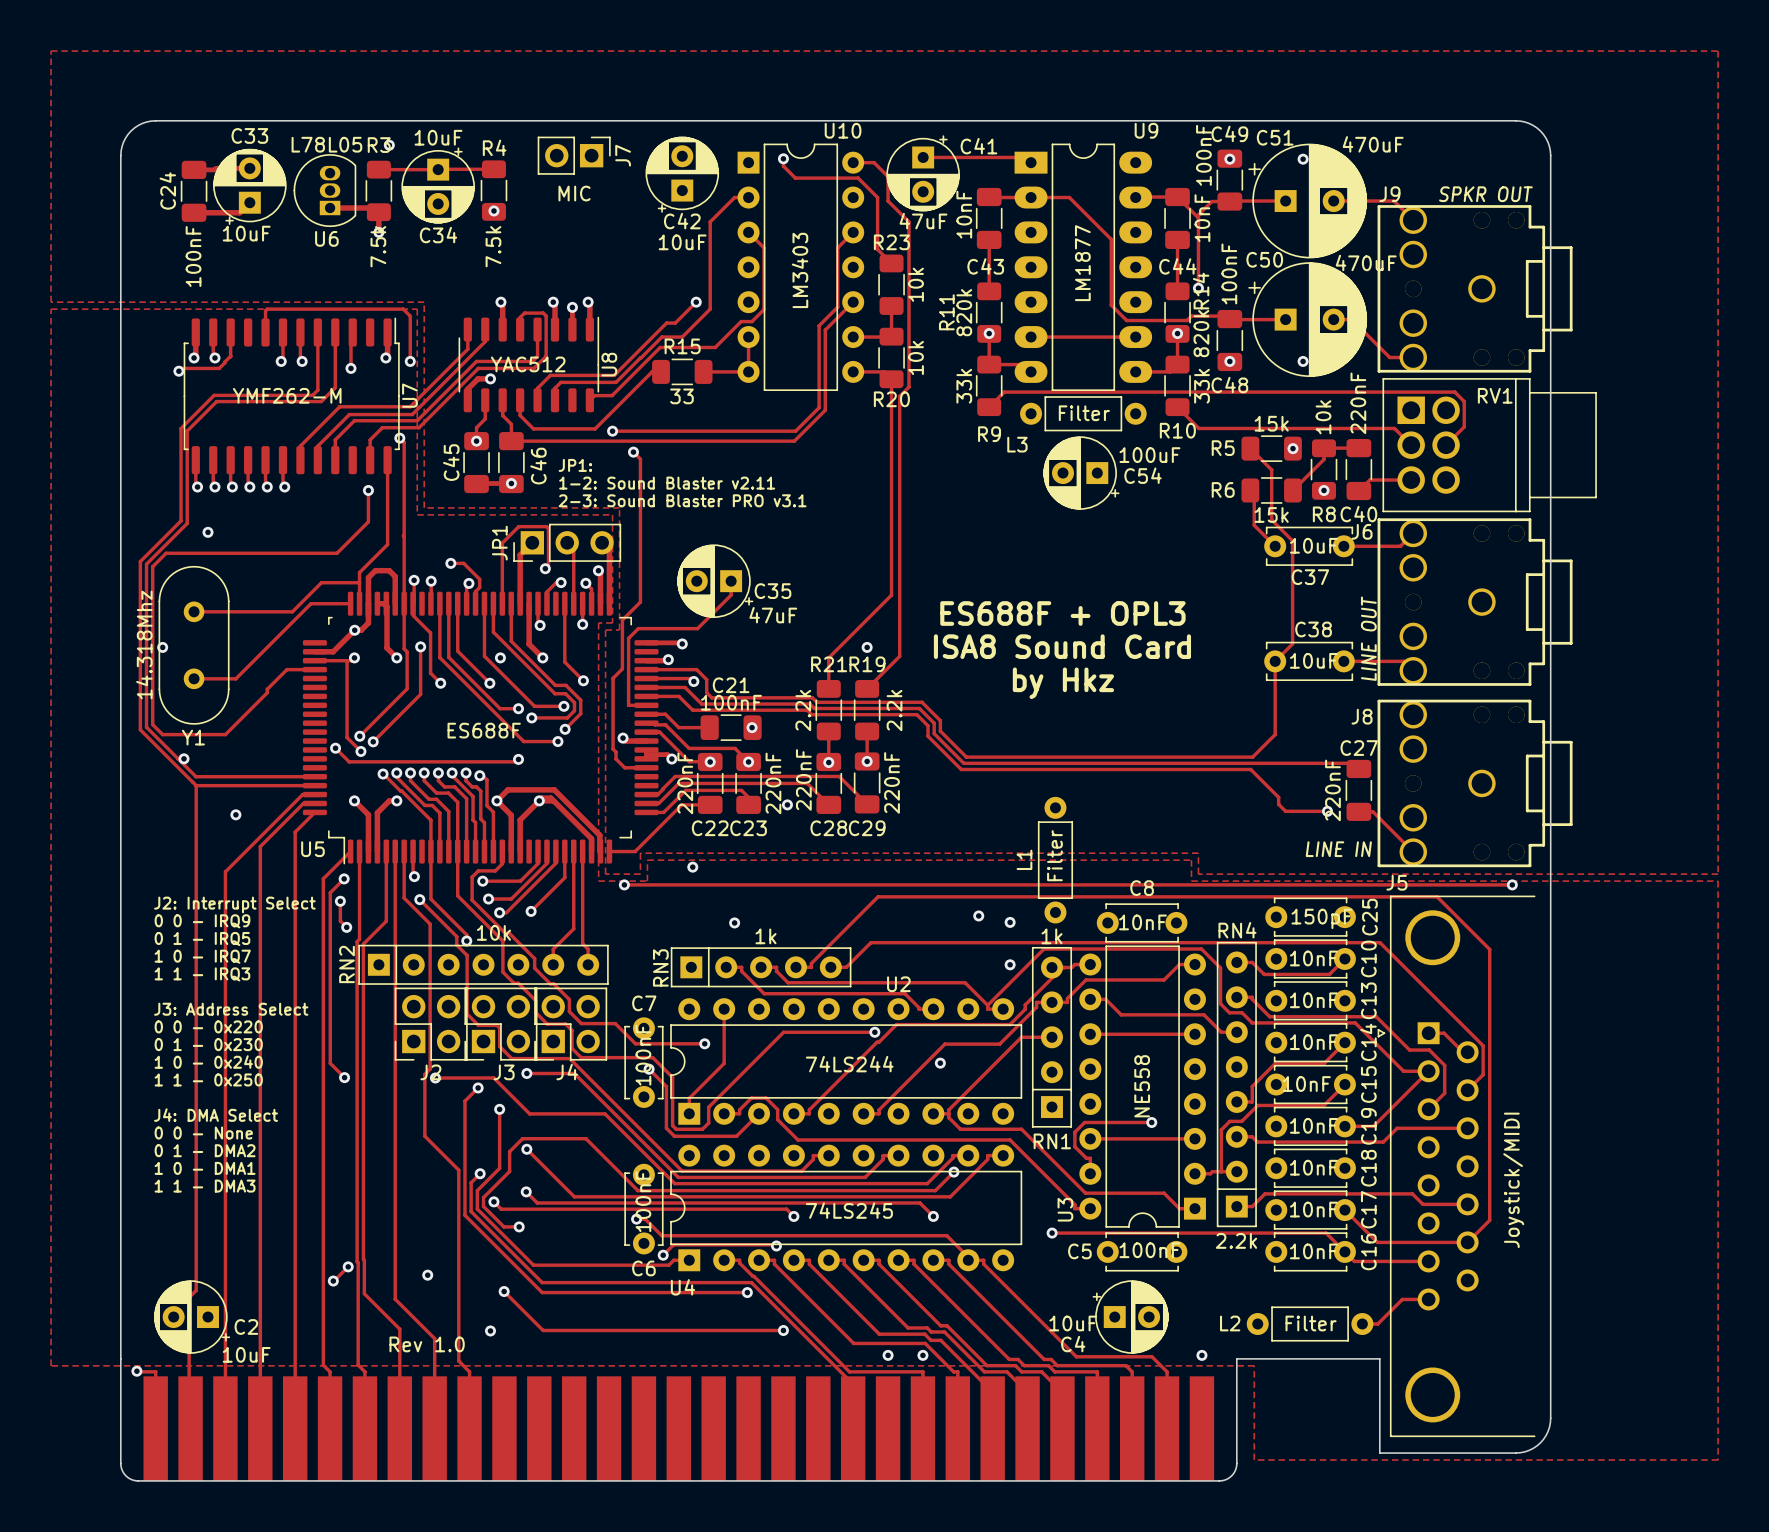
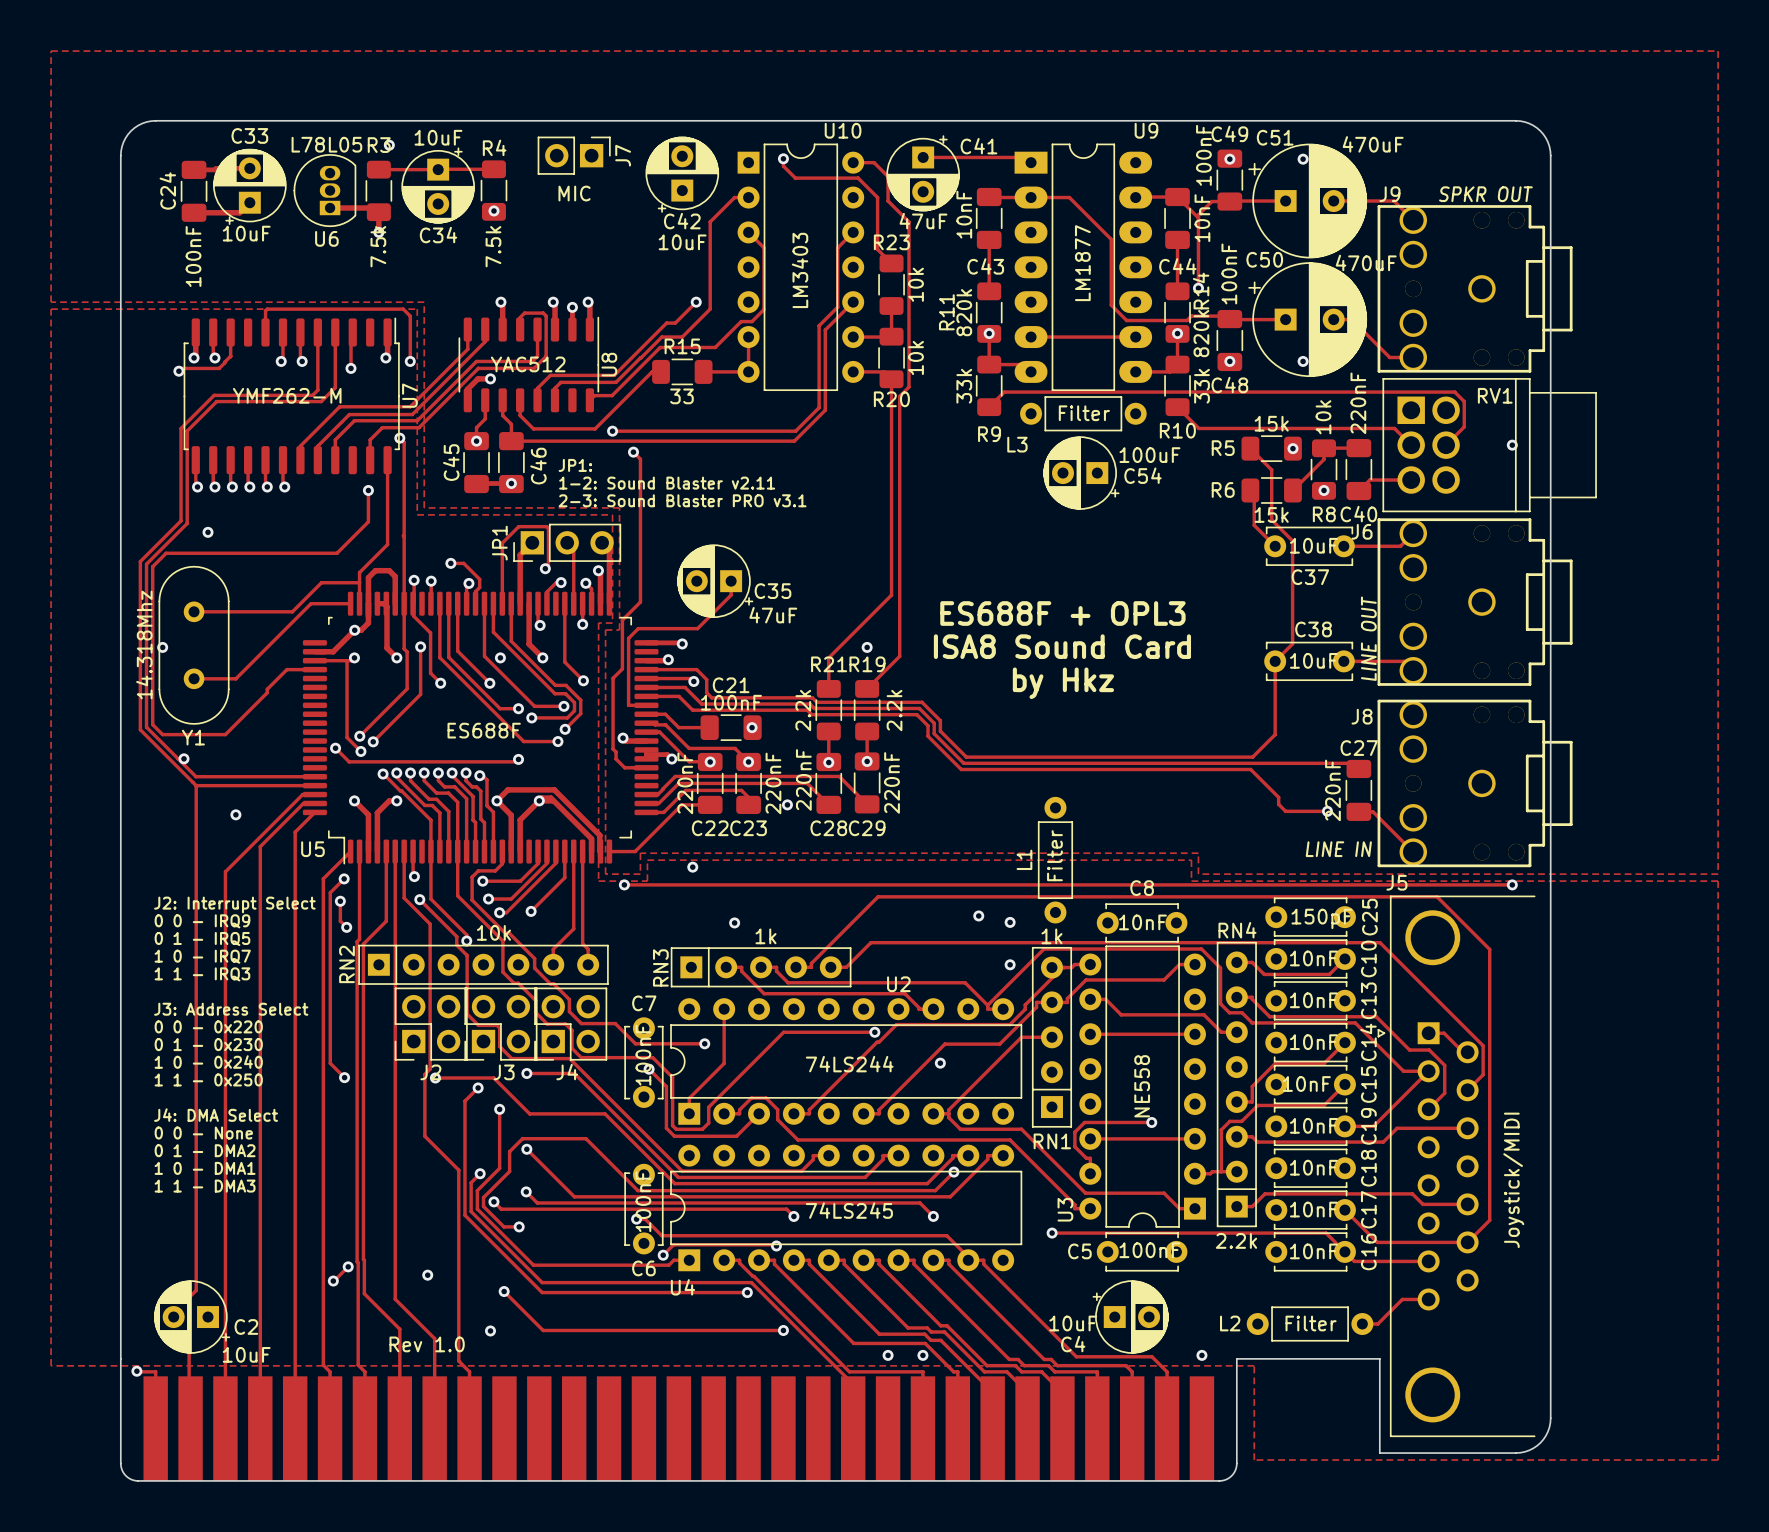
via: none -> (1512, 445)

